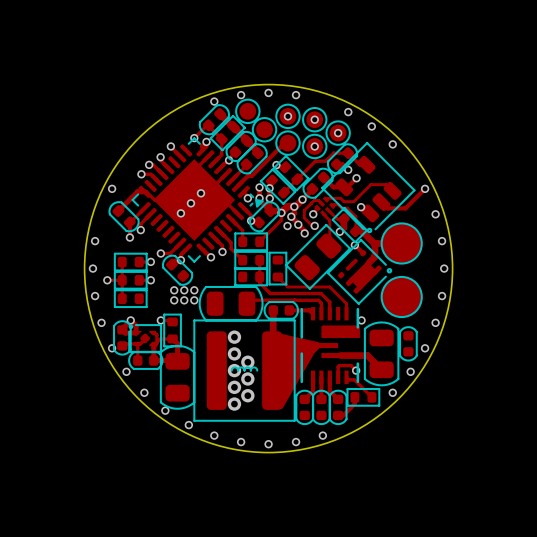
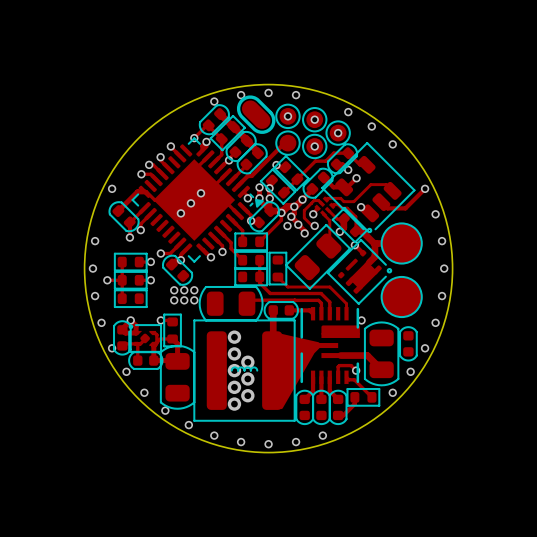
part: (247, 111) -> none
part: none -> (256, 114)
part: (264, 129) -> none

